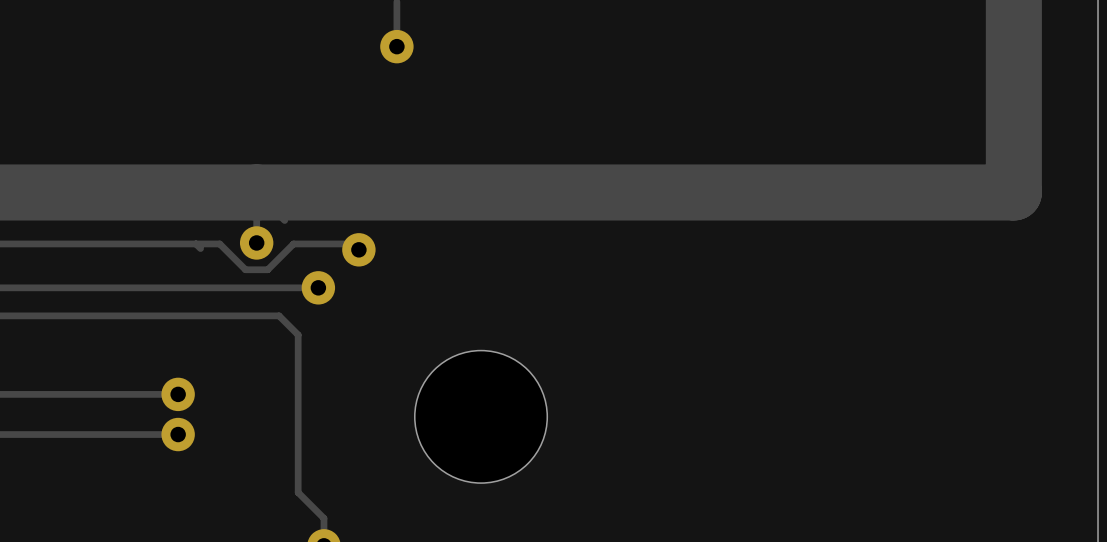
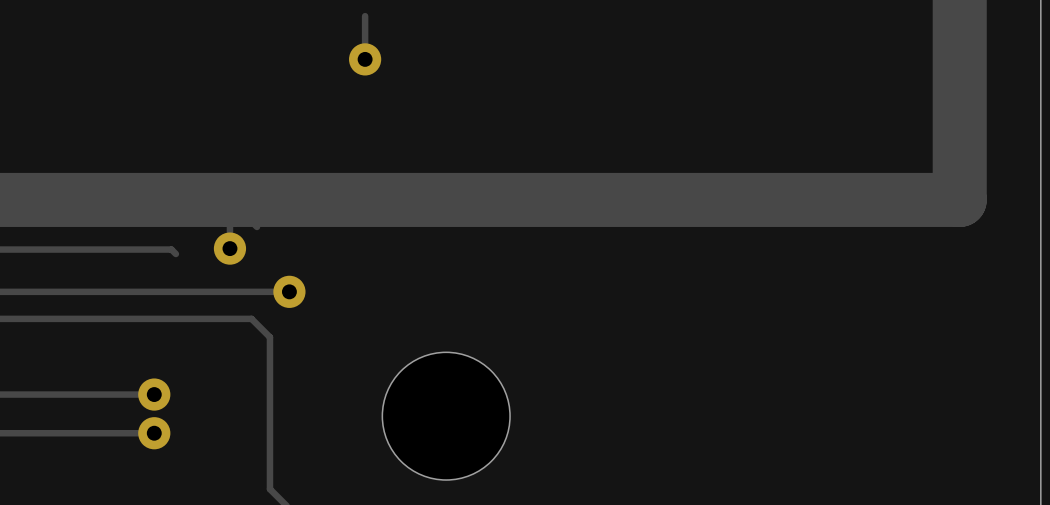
track: (195, 243) (219, 243) (245, 269) (267, 269) (293, 243) (353, 243) (358, 249) -> none
via: (358, 249) -> none

